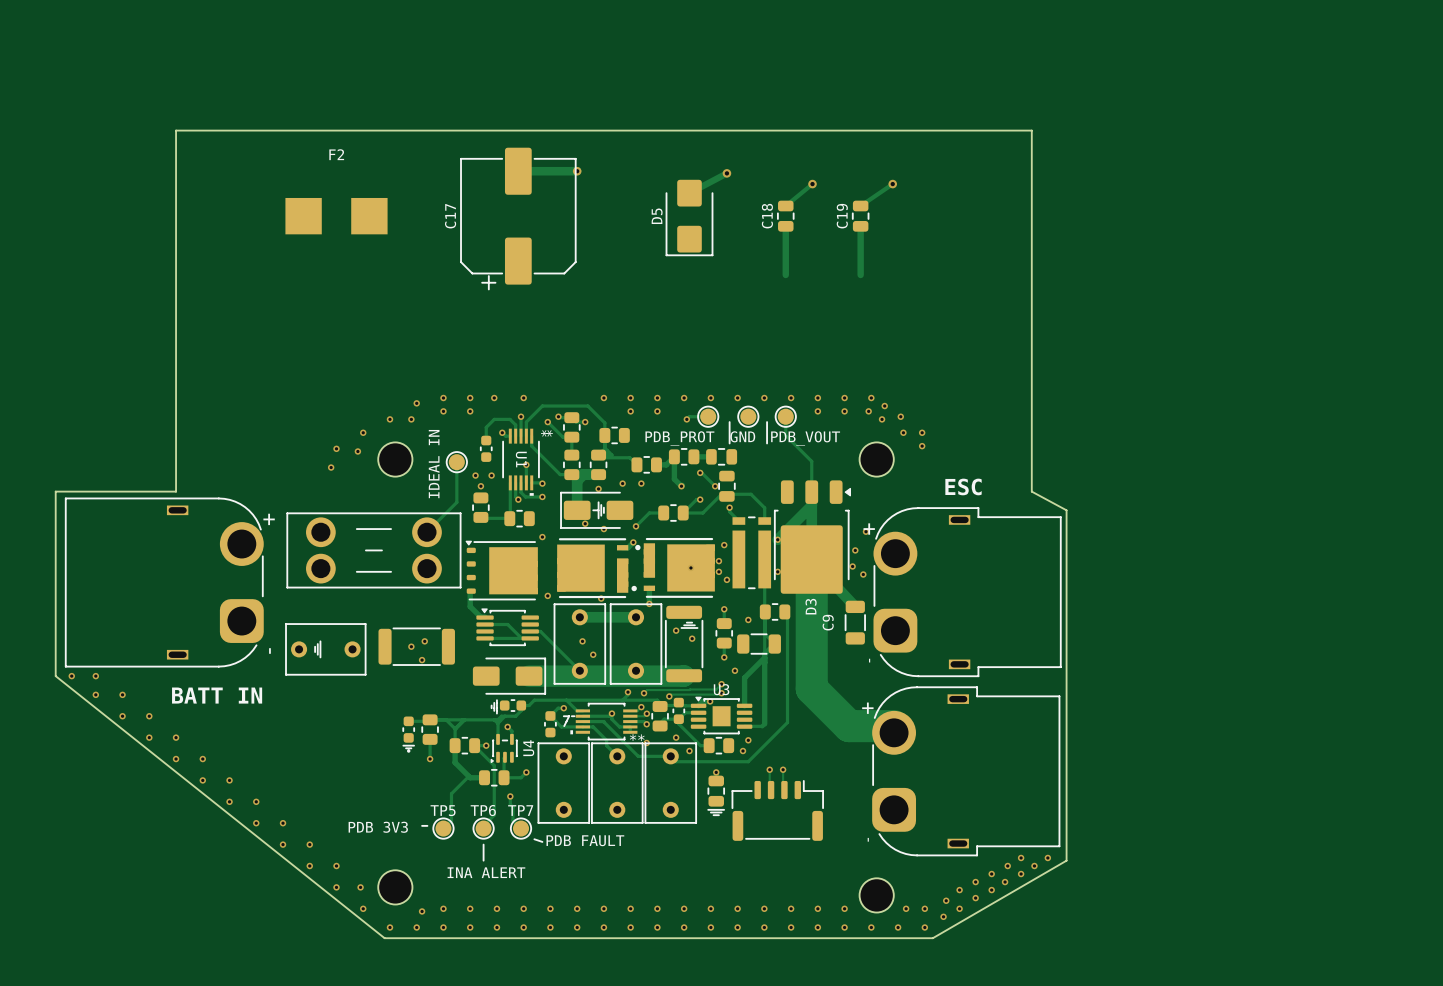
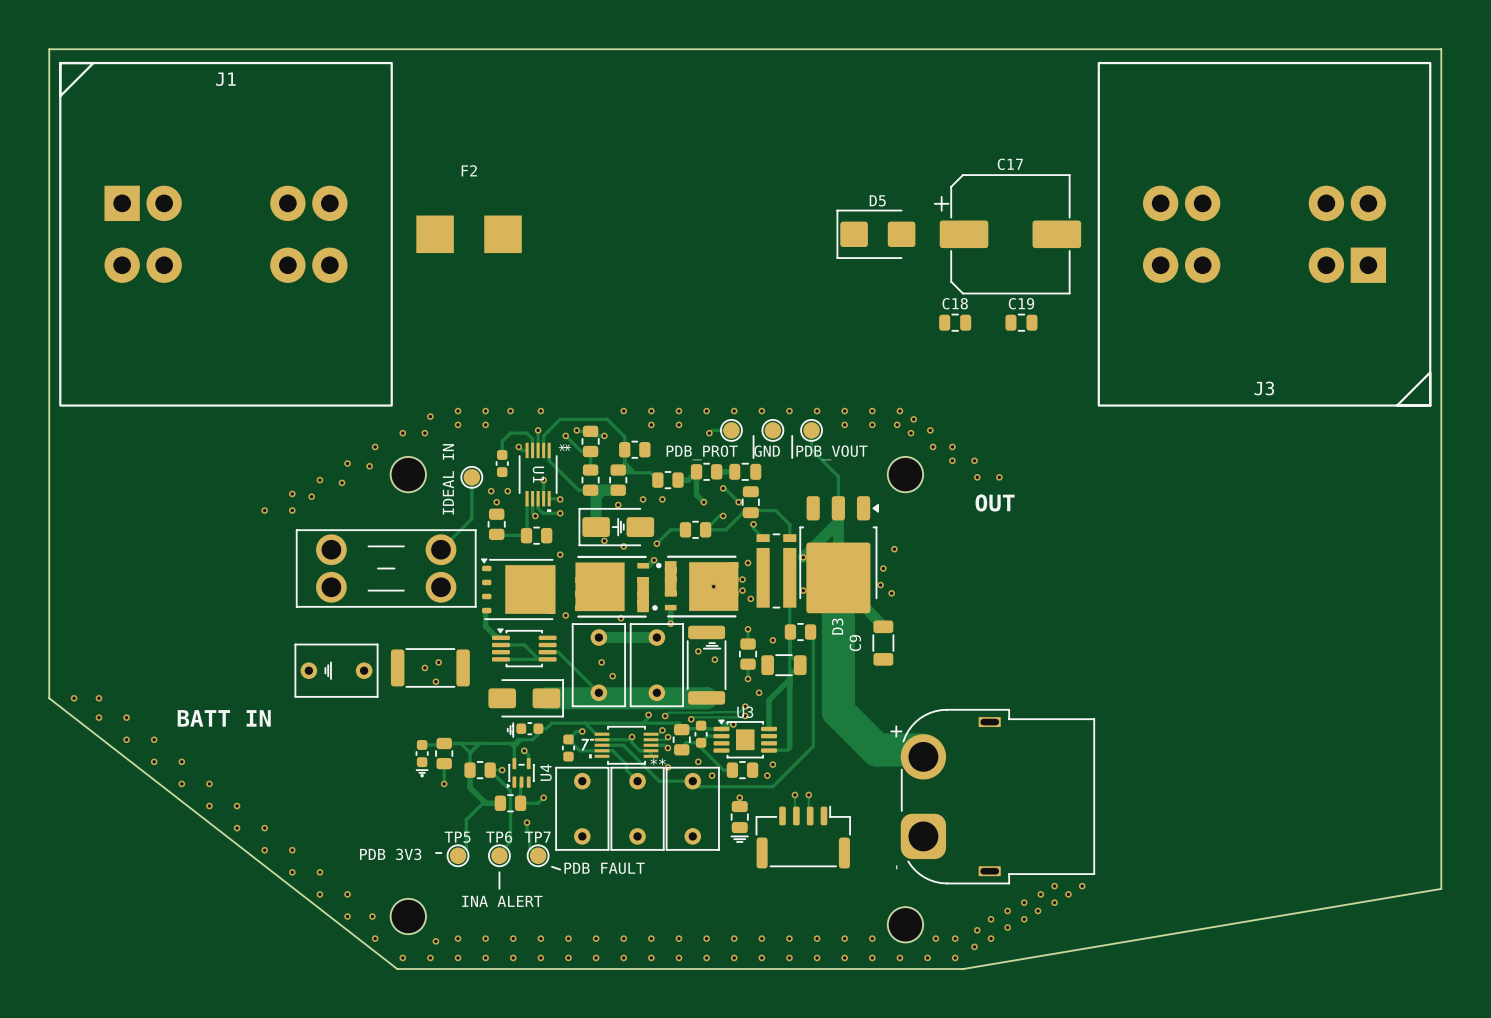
track: (518, 171) (577, 171) -> none
via: (577, 171) -> none
track: (726, 173) (689, 193) -> none
via: (726, 173) -> none
track: (812, 184) (785, 205) -> none
via: (812, 184) -> none
track: (892, 184) (860, 205) -> none
via: (892, 184) -> none
F2 position: (336, 216) -> (469, 234)
C18 rotation: 0° (785, 216) -> 90° clockwise (955, 322)
C18 position: (785, 216) -> (955, 322)
C19 rotation: 0° (860, 216) -> 90° clockwise (1021, 322)
C19 position: (860, 216) -> (1021, 322)
D5 rotation: 0° (689, 217) -> 90° clockwise (876, 234)
D5 position: (689, 217) -> (876, 234)
C17 rotation: 0° (518, 218) -> 90° clockwise (1007, 234)
C17 position: (518, 218) -> (1007, 234)
J1: none -> (226, 234)
track: (785, 226) (785, 274) -> none
track: (860, 226) (860, 274) -> none
J3: none -> (1264, 234)
via: none -> (974, 460)
via: none -> (977, 477)
via: none -> (999, 477)
via: none -> (319, 480)
via: none -> (292, 493)
via: none -> (311, 496)
text: ESC (963, 486) -> OUT (995, 502)
via: none -> (264, 510)
via: none -> (292, 510)
part: (164, 582) -> none
part: (967, 592) -> none
board edge: (384, 938) (55, 676) (55, 491) (176, 491) (176, 130) (1031, 130) (1031, 491) (1066, 510) (1066, 860) (932, 938) -> (397, 968) (49, 698) (49, 49) (1441, 49) (1441, 888) (963, 968)

